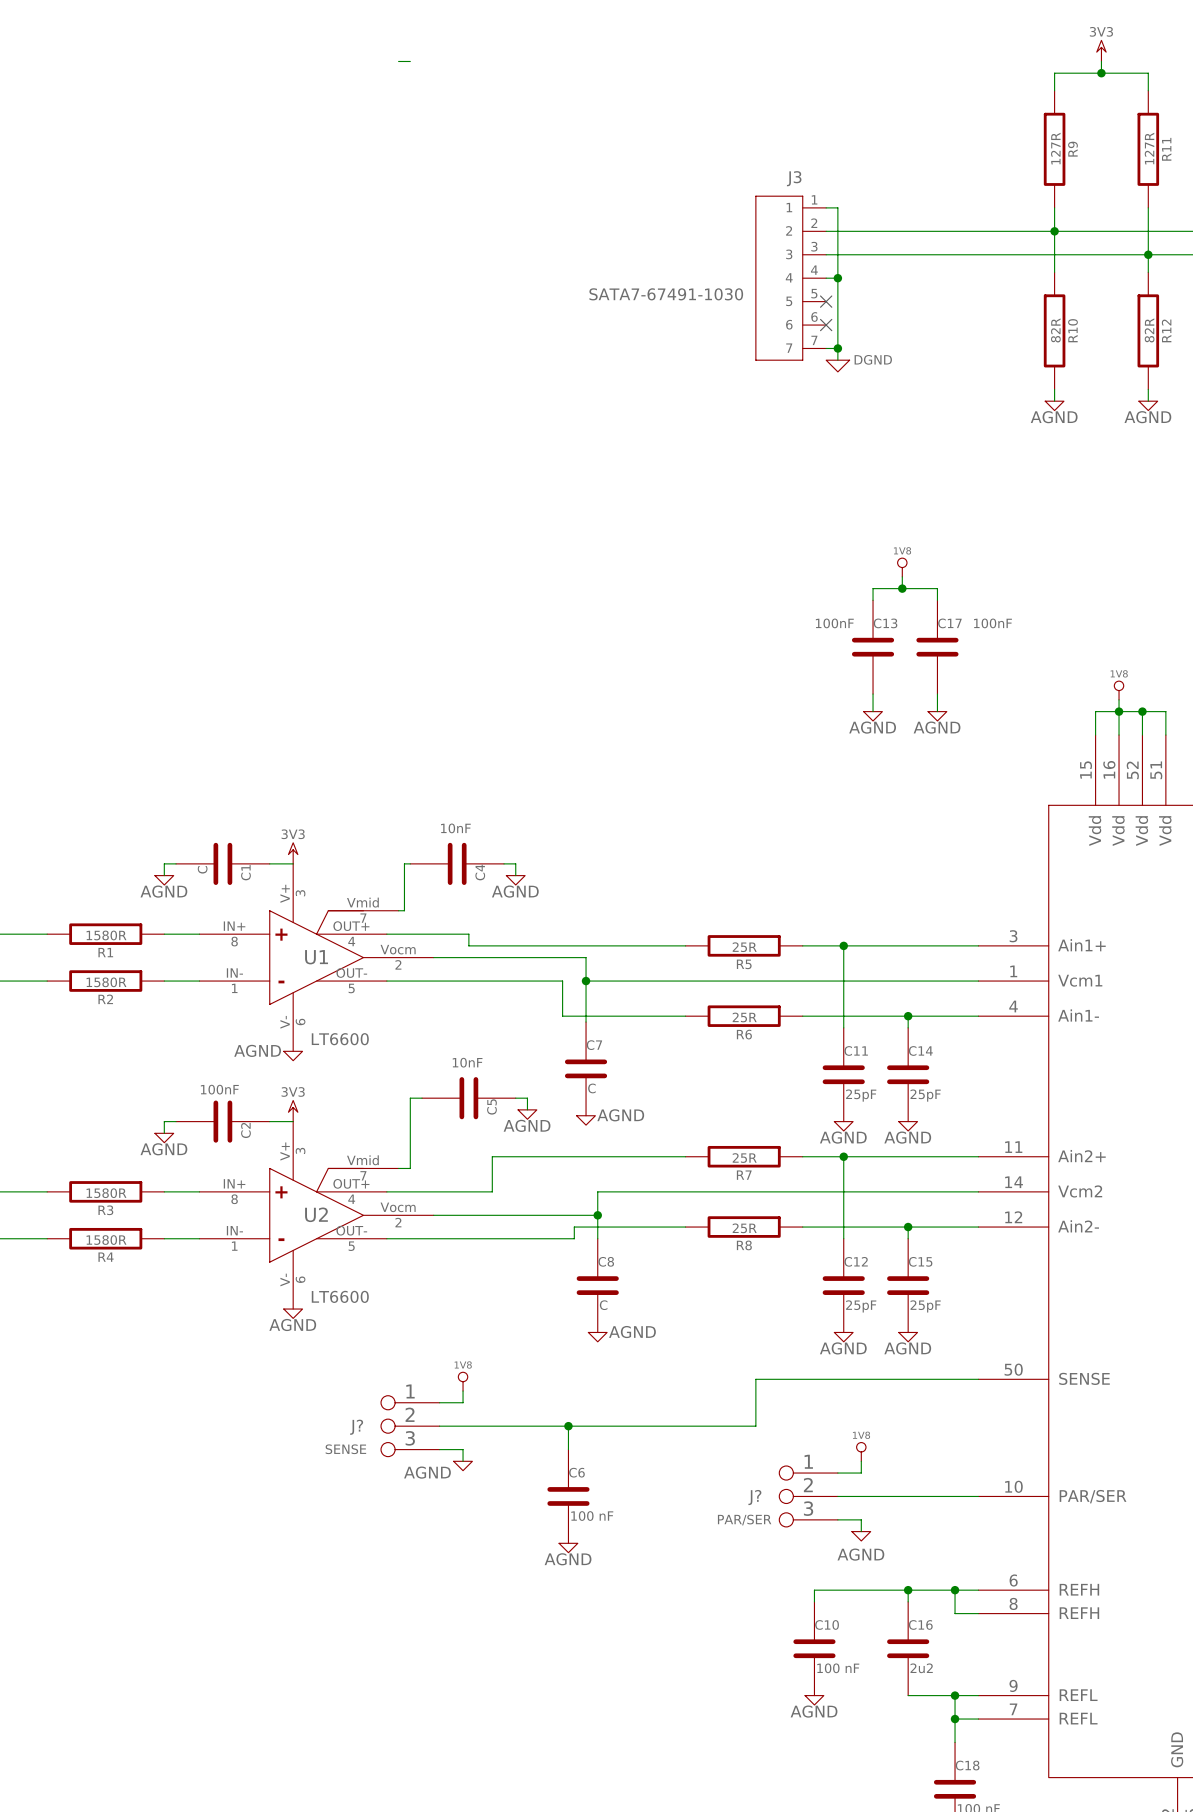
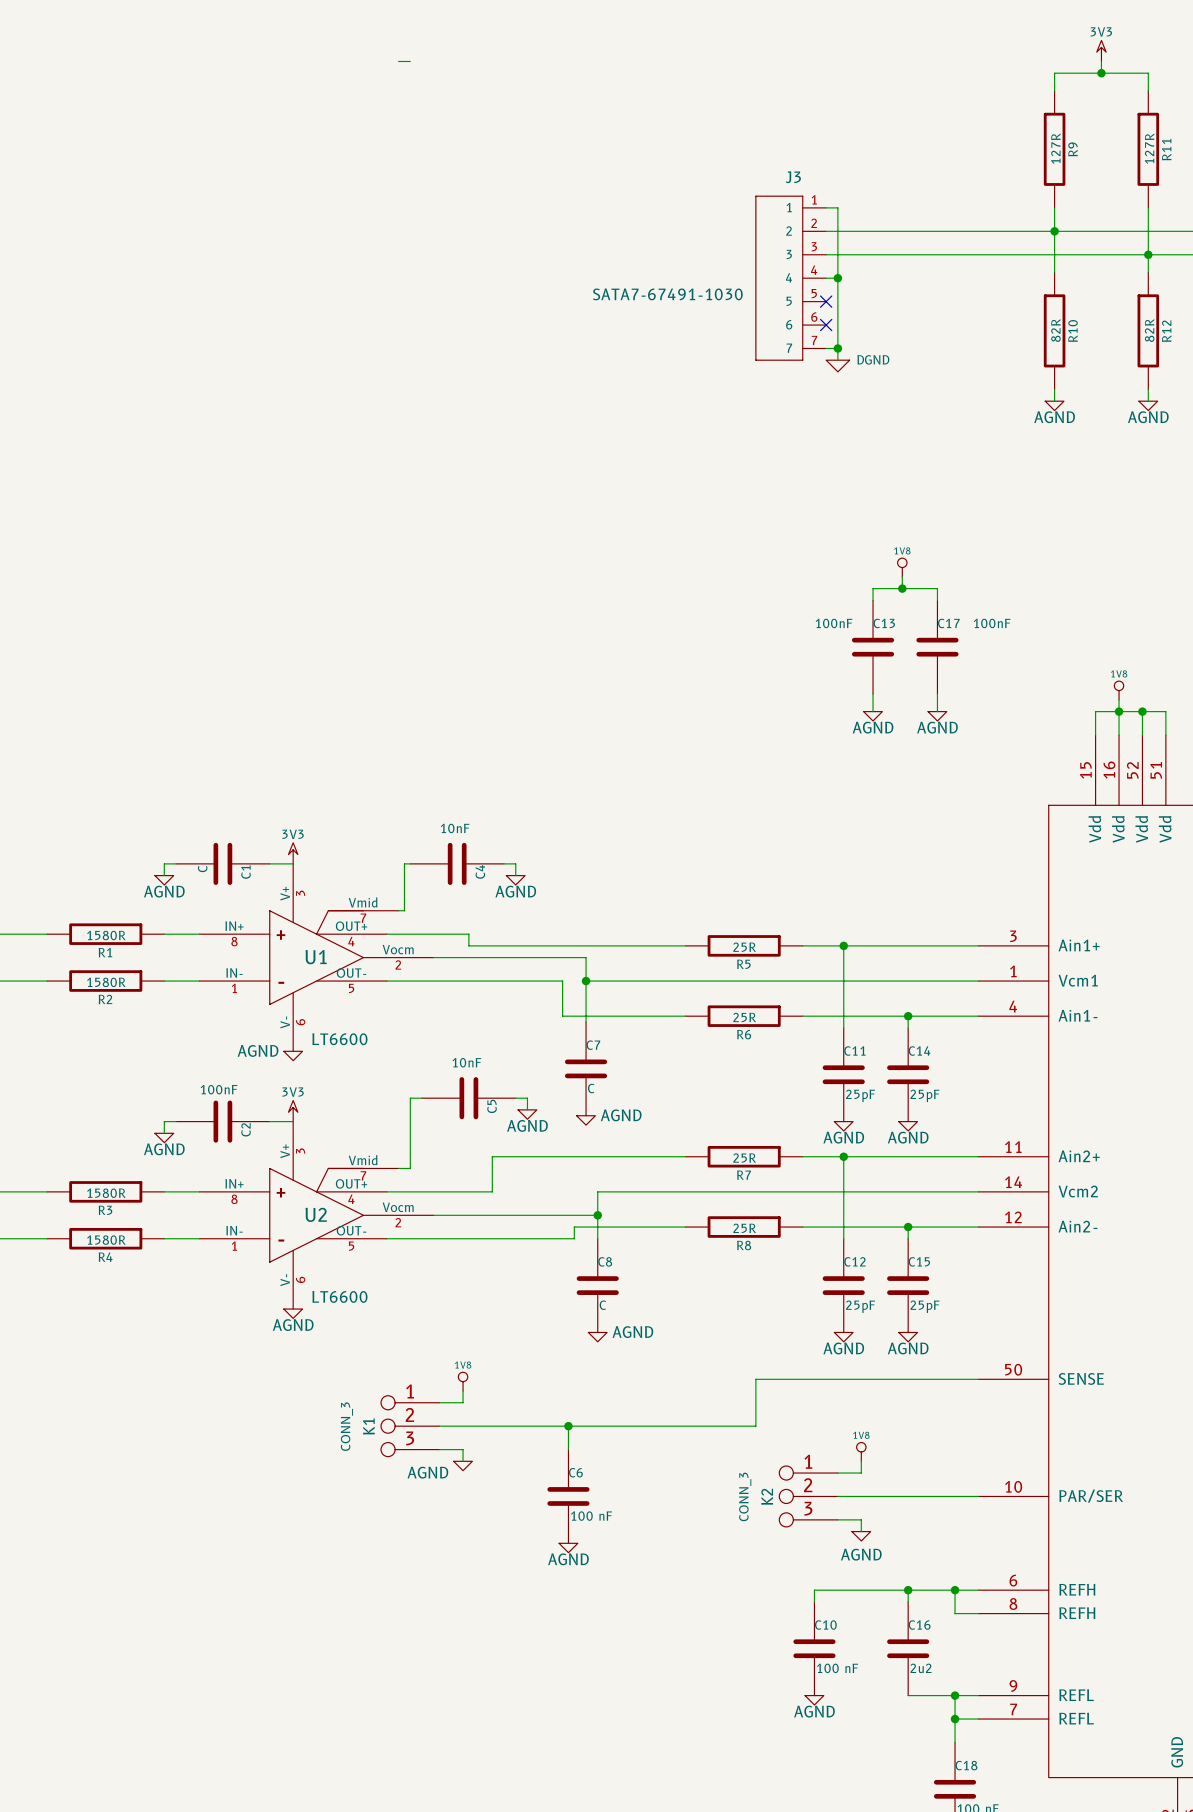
J? name: J? (356, 1427) -> K1 (368, 1426)
J? value: SENSE (345, 1449) -> CONN_3 (346, 1426)
J? name: J? (754, 1497) -> K2 (767, 1496)
J? value: PAR/SER (744, 1520) -> CONN_3 (745, 1496)

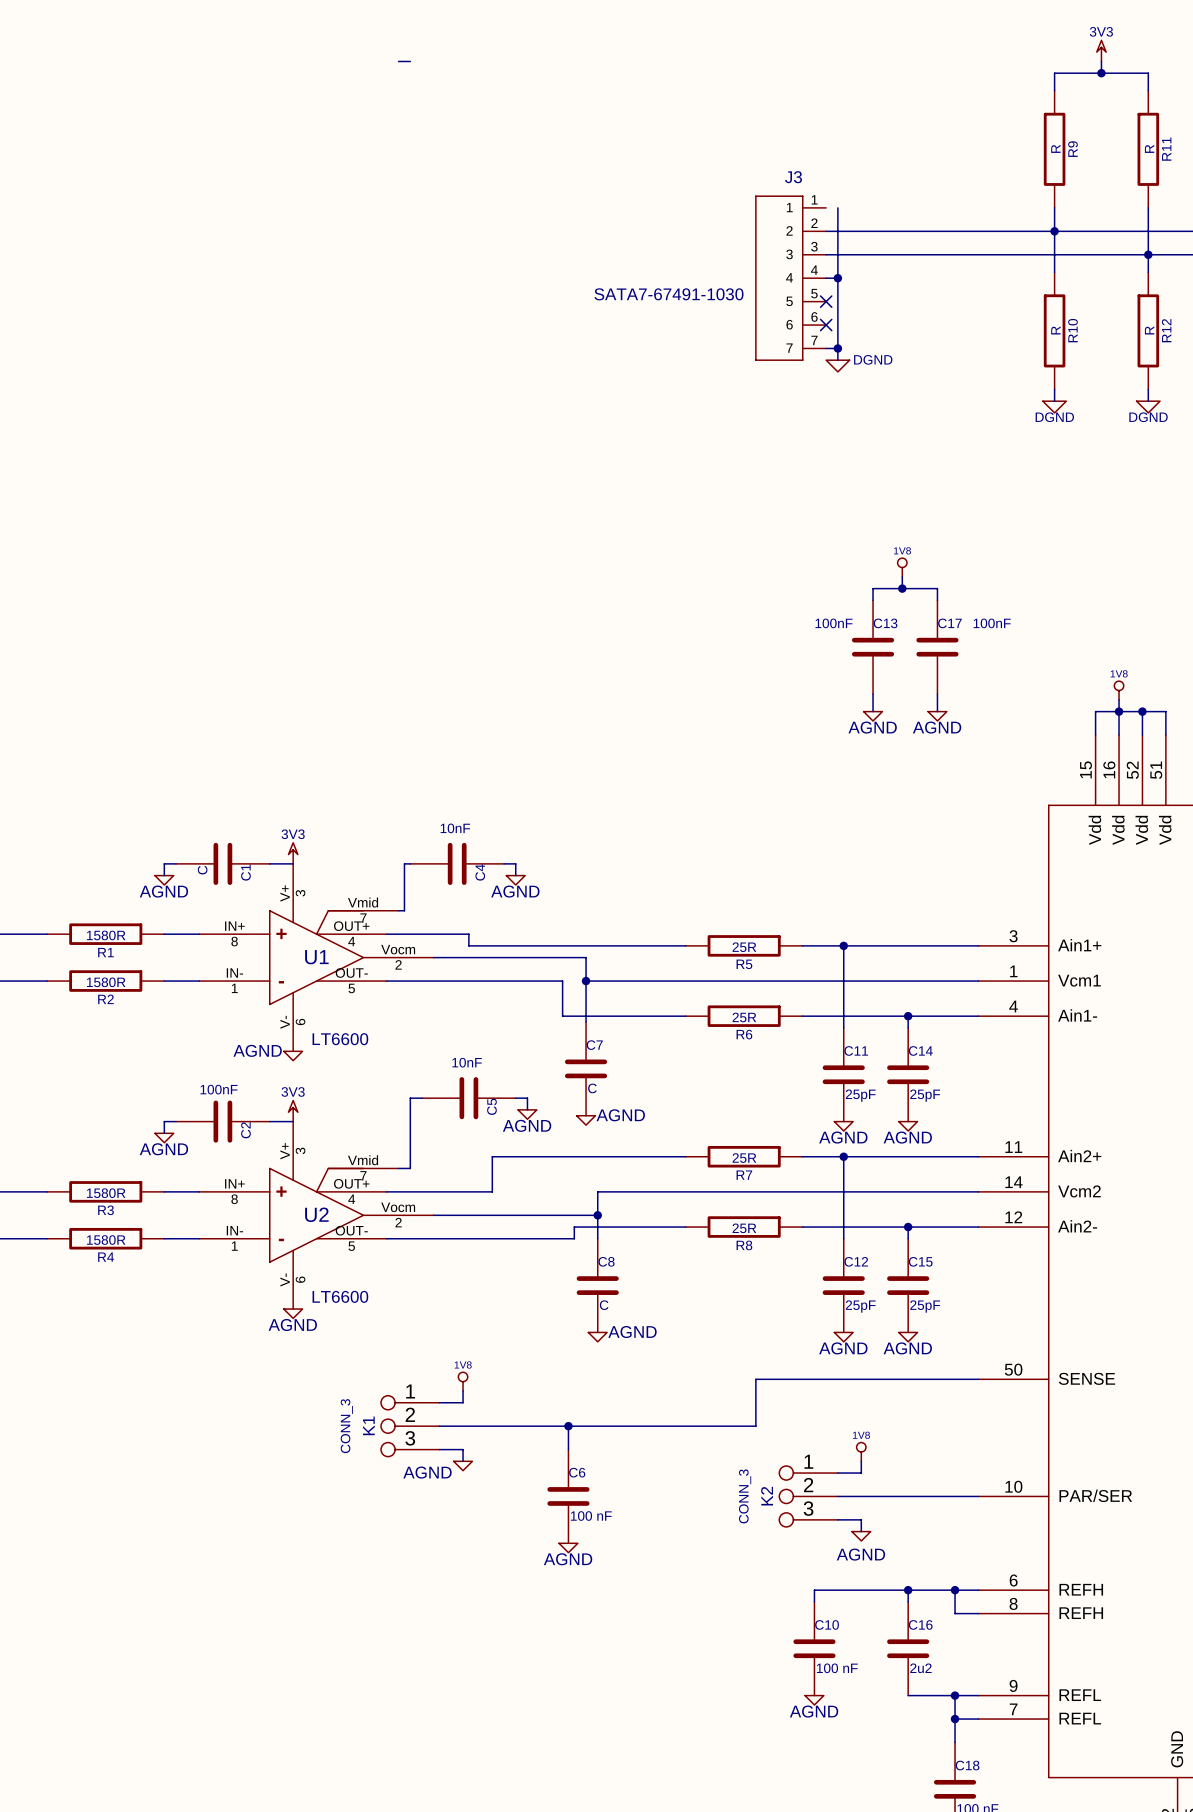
R9 value: 127R (1055, 148) -> R (1055, 148)
R11 value: 127R (1149, 148) -> R (1149, 148)
wire: (826, 207) (837, 207) -> none
R10 value: 82R (1055, 330) -> R (1055, 330)
R12 value: 82R (1149, 330) -> R (1149, 330)
power symbol: AGND (1054, 405) -> DGND (1054, 407)
power symbol: AGND (1148, 405) -> DGND (1148, 407)

